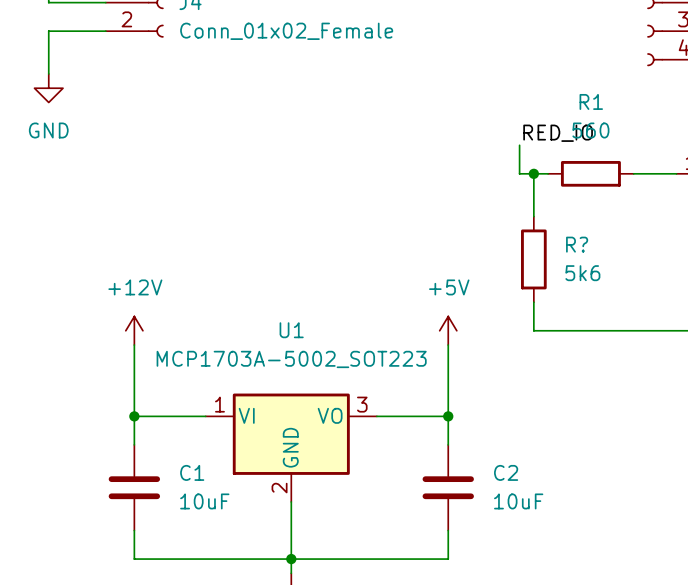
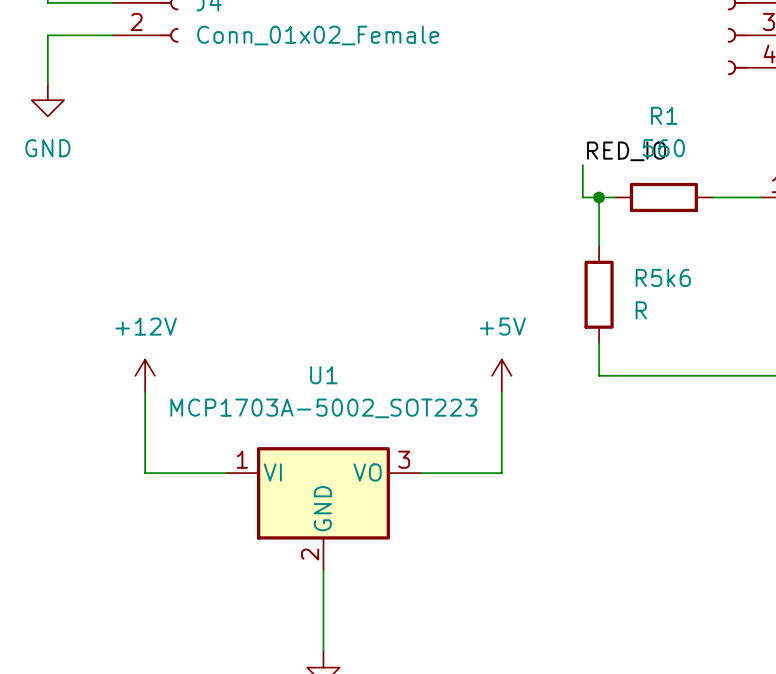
R? name: R? (577, 244) -> R5k6 (663, 277)
R? value: 5k6 (582, 273) -> R (641, 310)
wire: (134, 416) (134, 444) -> none
junction: (134, 416) -> none
wire: (448, 416) (448, 444) -> none
junction: (448, 416) -> none
C1: 10uF (134, 487) -> none
C2: 10uF (448, 487) -> none
wire: (134, 530) (134, 559) (448, 559) (448, 530) -> none
junction: (291, 559) -> none

